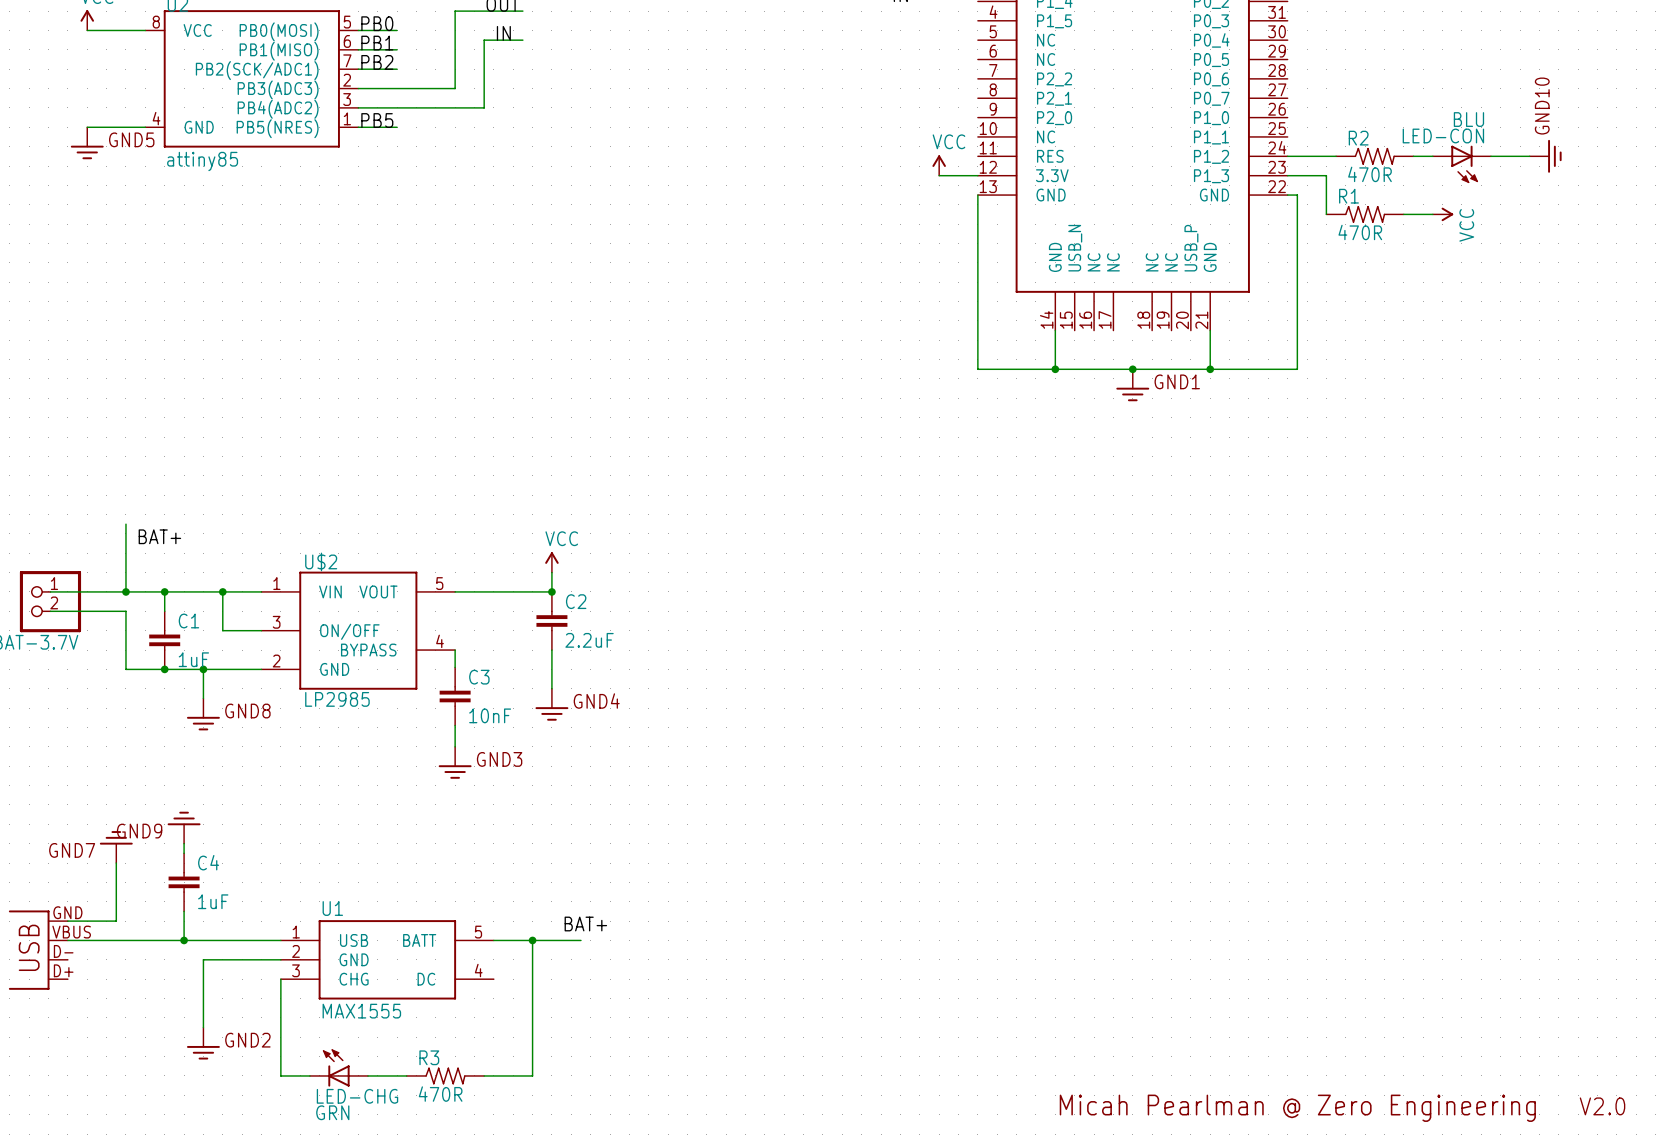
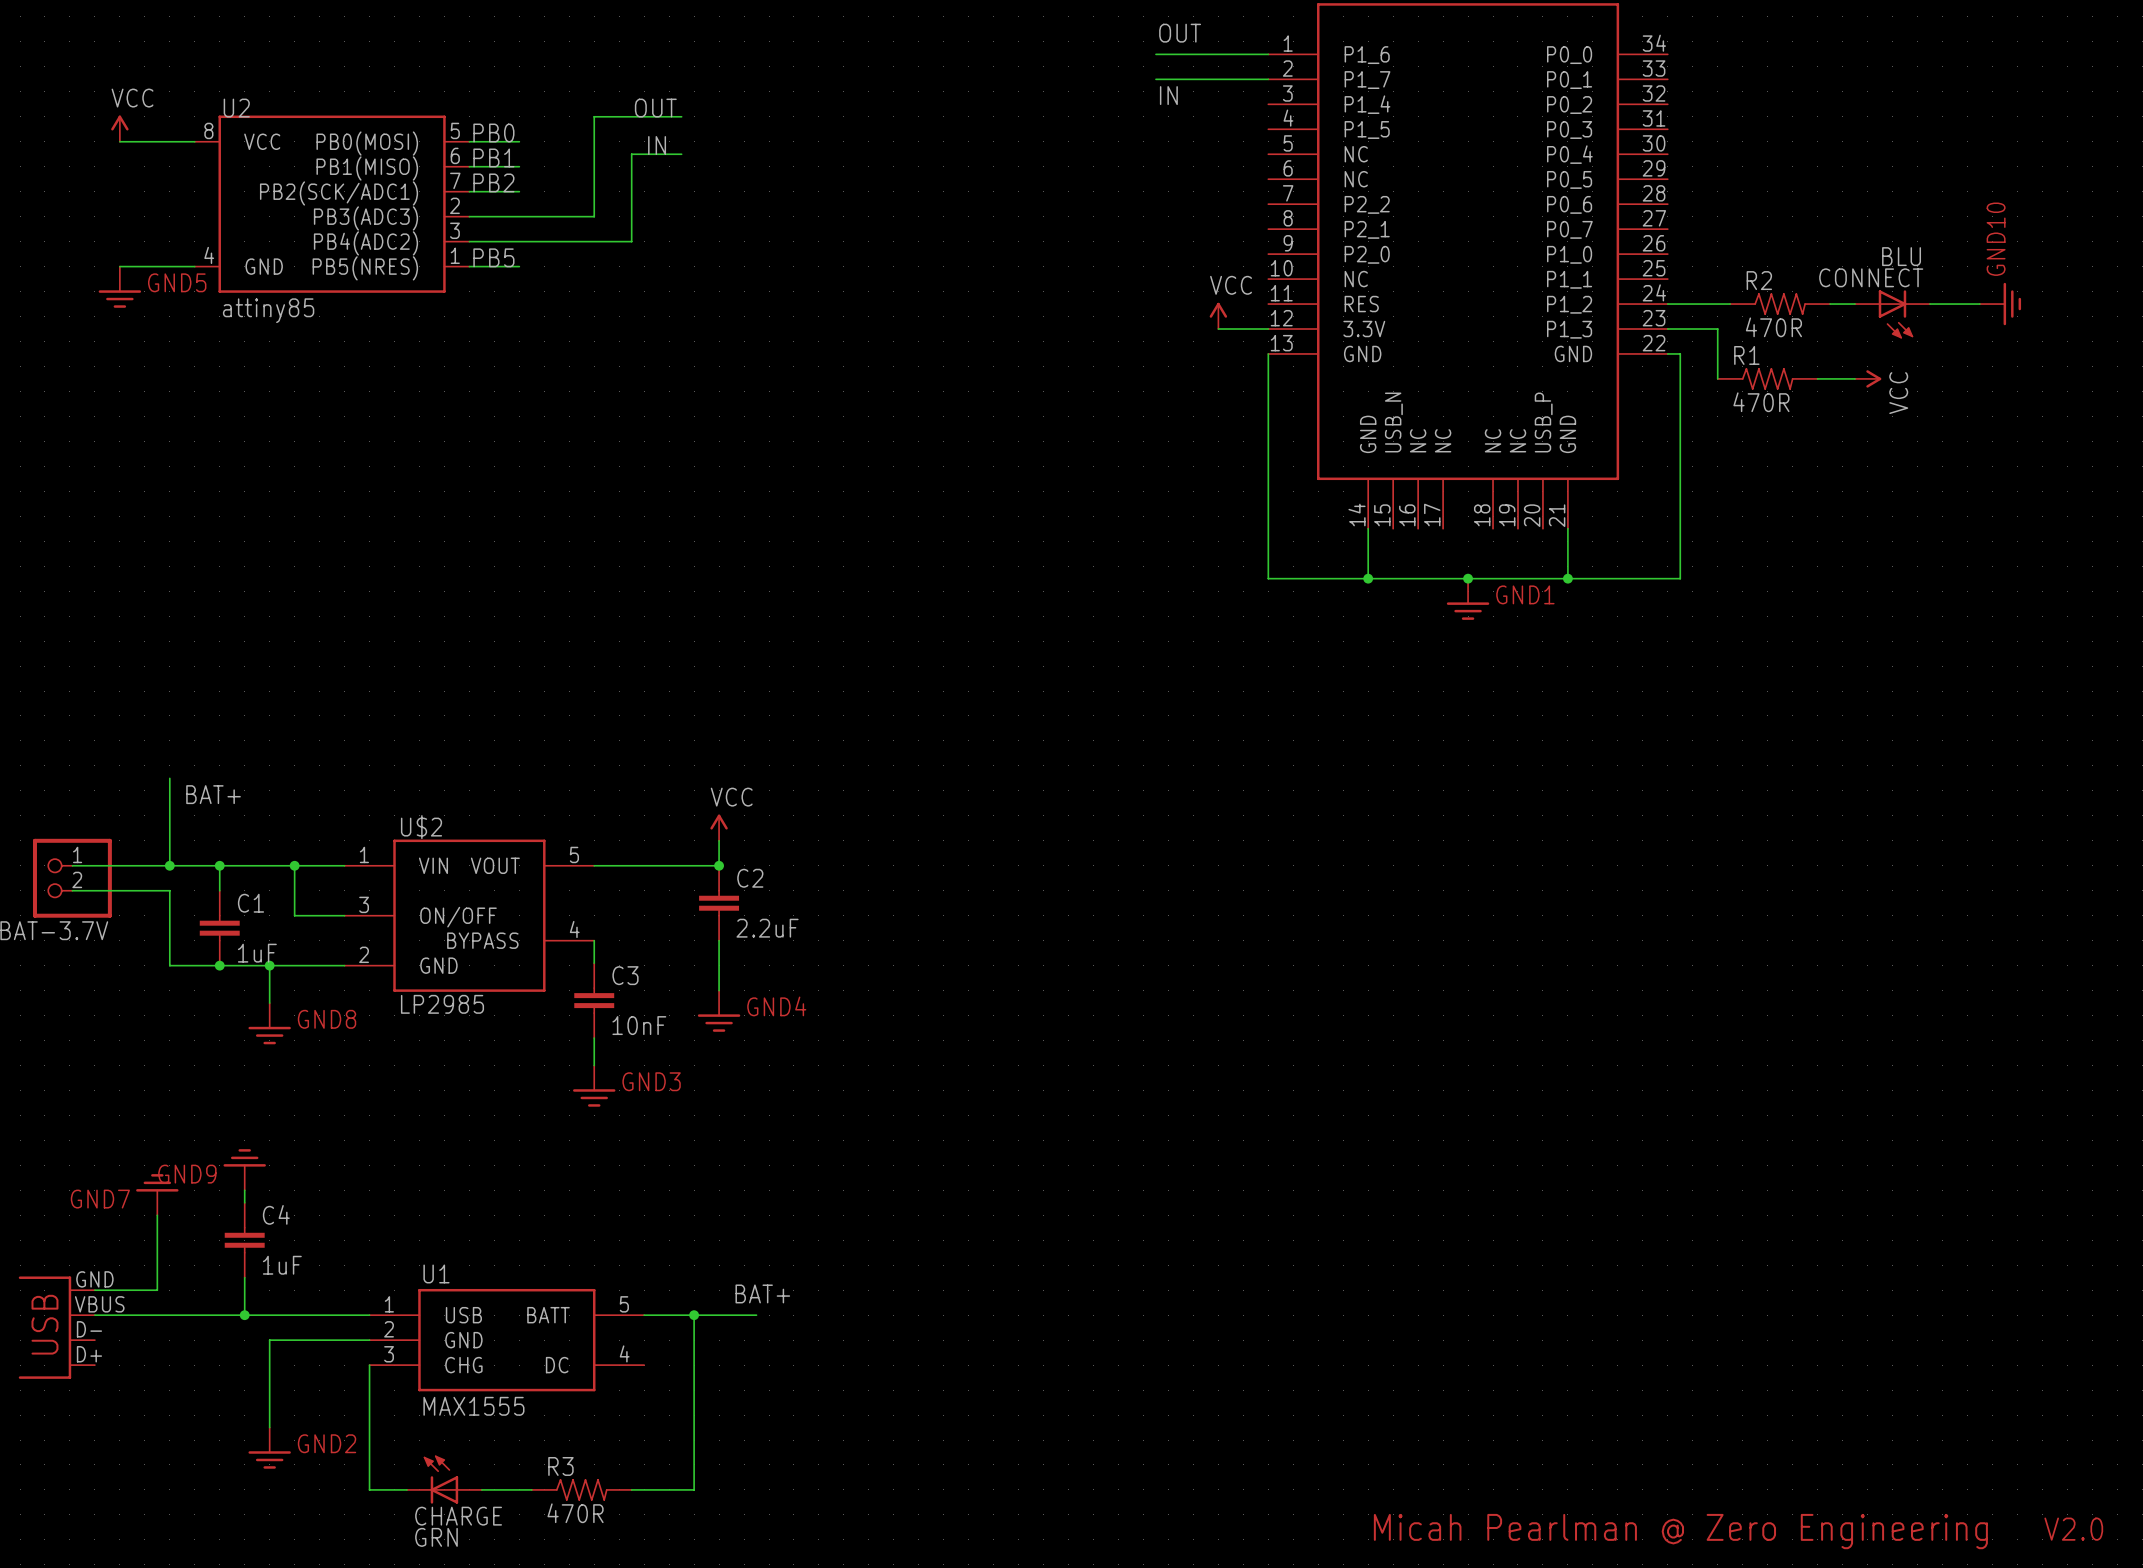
LED-CON name: LED-CON (1443, 135) -> CONNECT (1871, 277)
LED-CHG name: LED-CHG (357, 1096) -> CHARGE (458, 1516)

